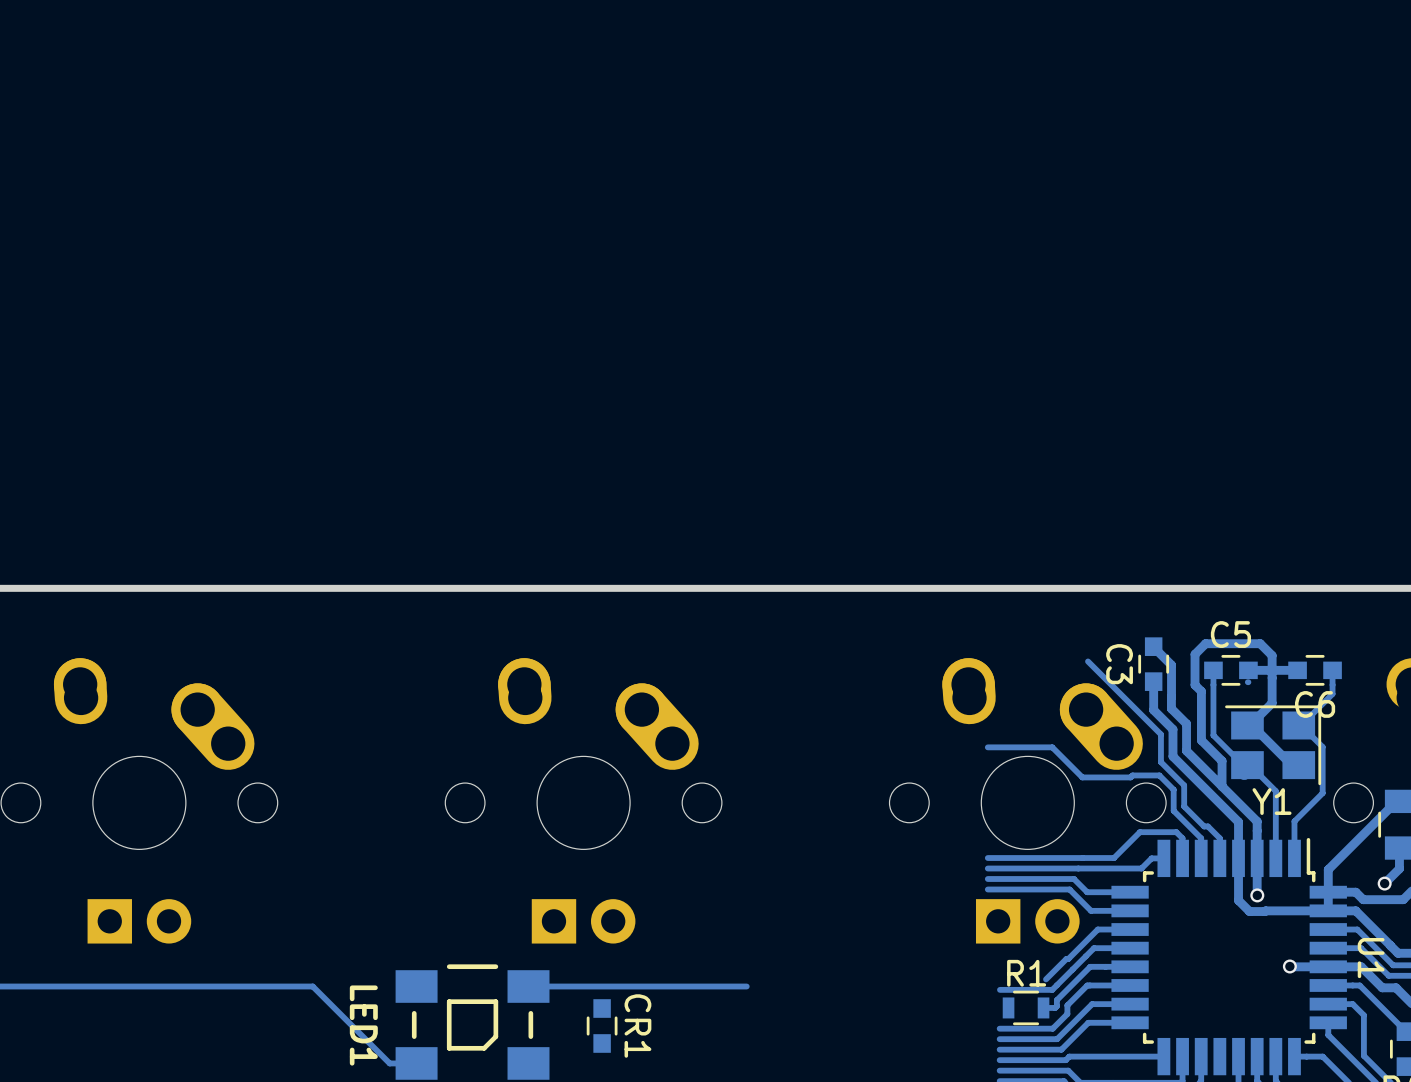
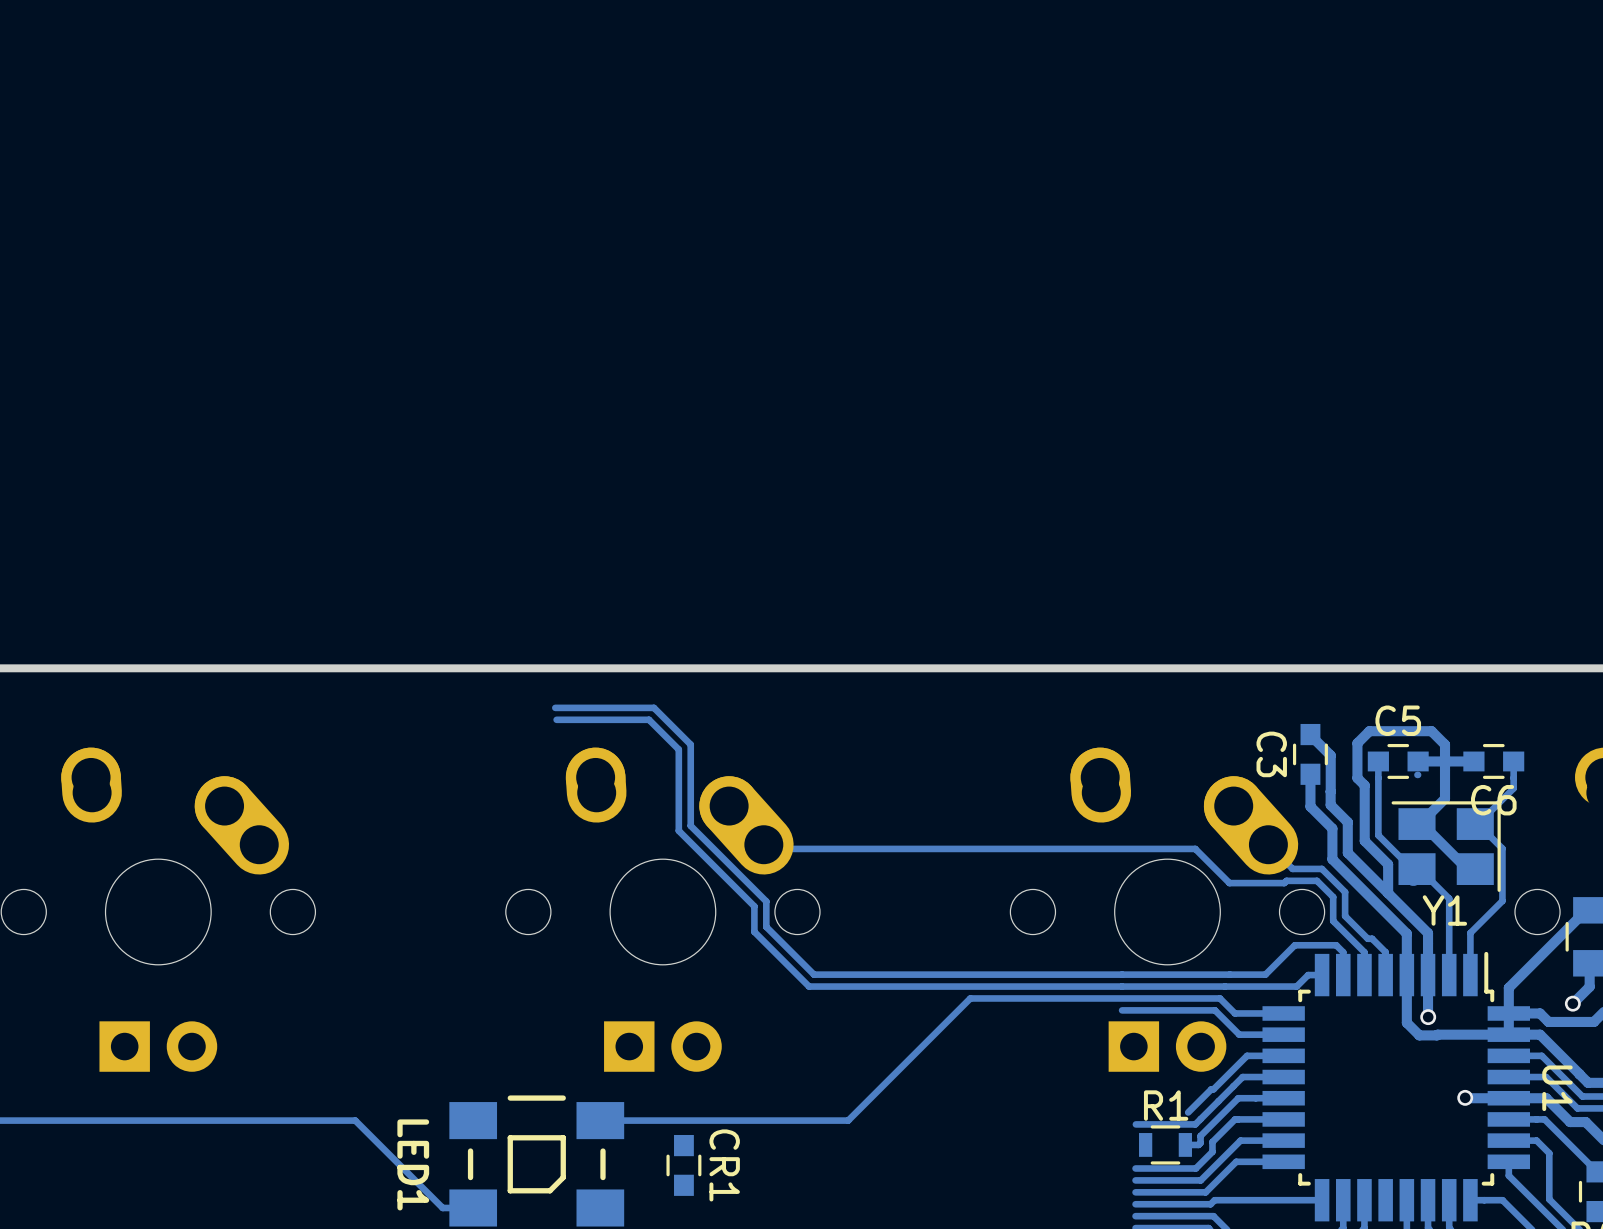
track: none -> (555, 707) (653, 707) (690, 744) (690, 825) (766, 901) (766, 926) (814, 974) (1122, 974)
track: none -> (556, 719) (649, 719) (678, 749) (678, 830) (754, 906) (754, 931) (809, 986) (1122, 986)
track: (1088, 661) (1160, 734) (1160, 762) (1163, 764) -> (1268, 844) (1292, 868) (1321, 868)
track: none -> (763, 844) (768, 848) (1122, 848)
track: none -> (1122, 998) (970, 998) (848, 1120)

